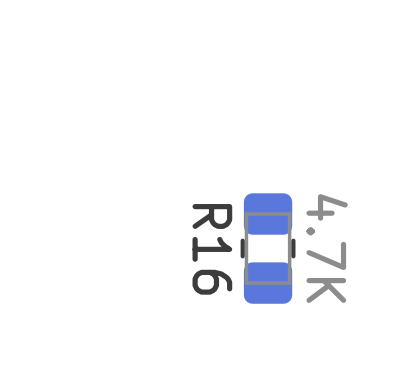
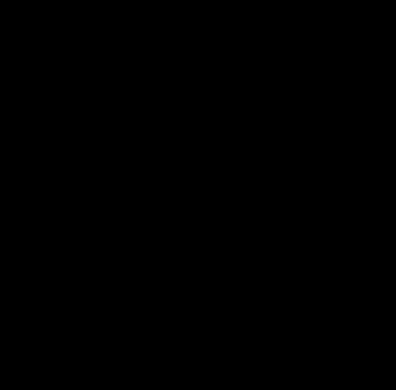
R16: 4.7K (268, 248) -> none

